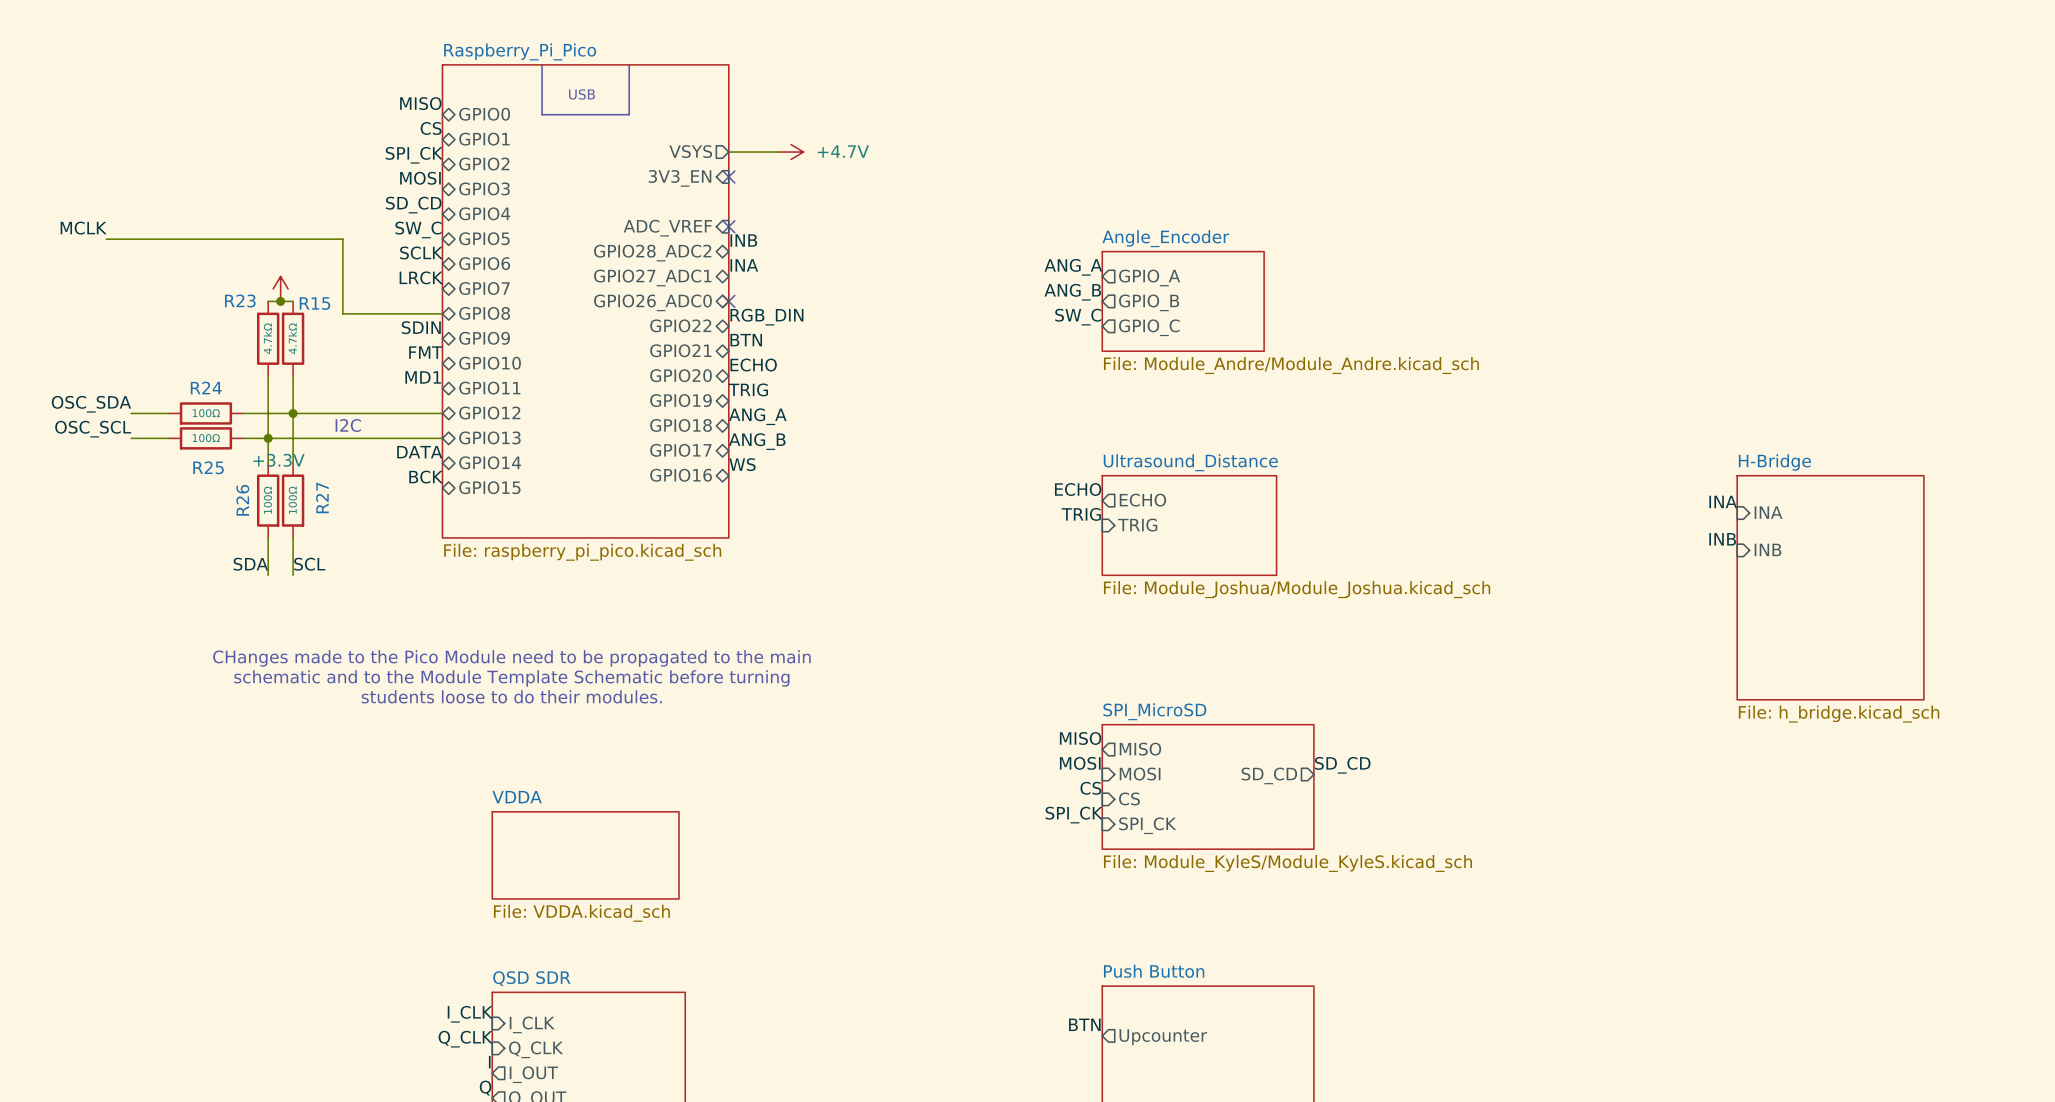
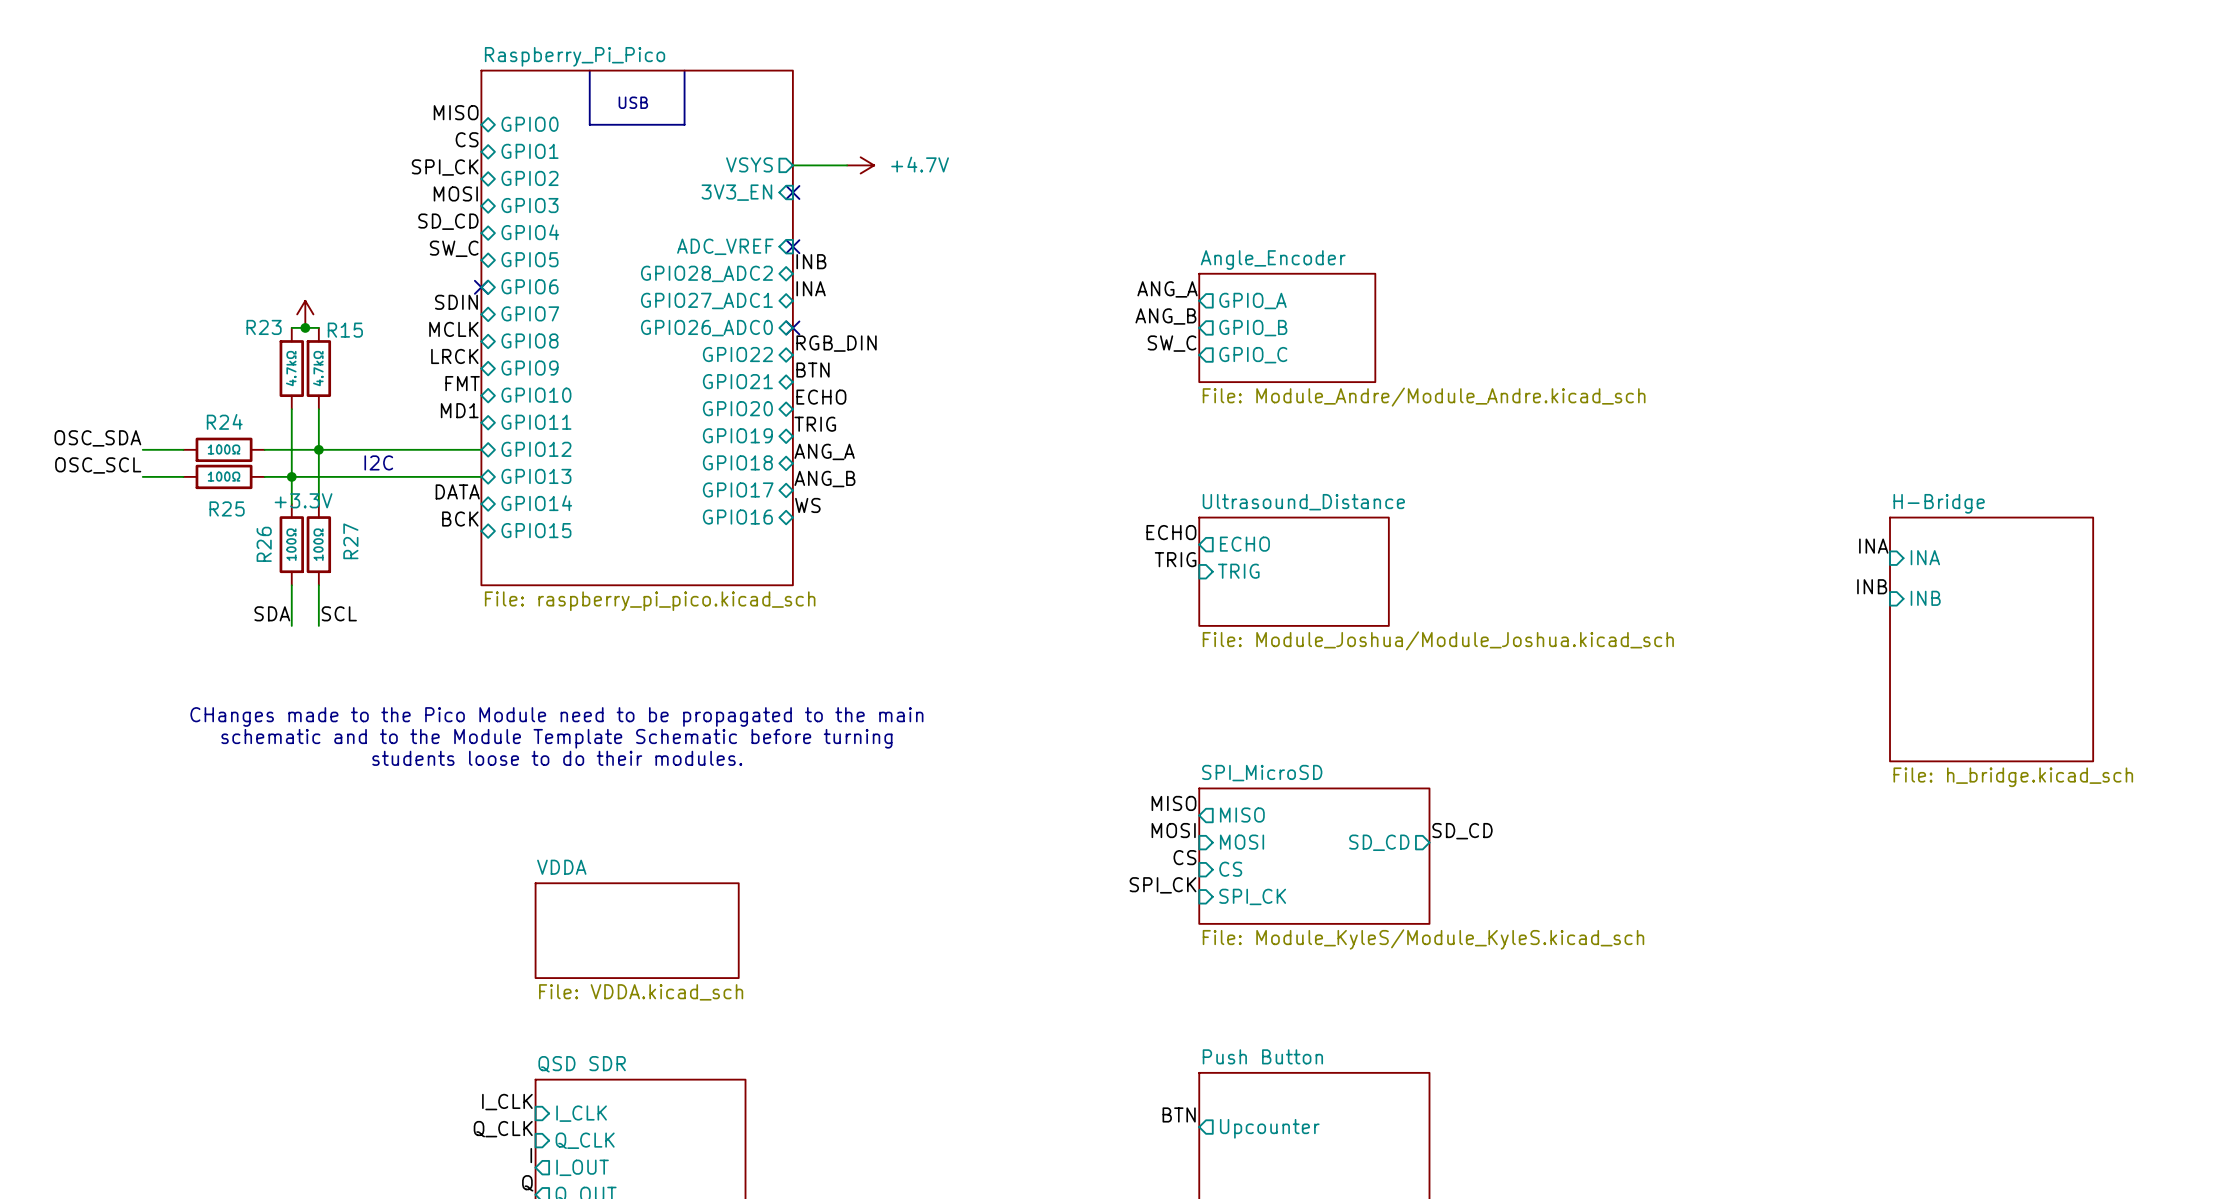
label: MCLK (83, 228) -> none
wire: (106, 239) (342, 239) (342, 313) (442, 313) -> none
label: SCLK (421, 252) -> none
no-connect mark: none -> (481, 287)
label: LRCK (421, 277) -> SDIN (456, 302)
label: none -> MCLK (453, 329)
label: SDIN (421, 327) -> LRCK (454, 356)

